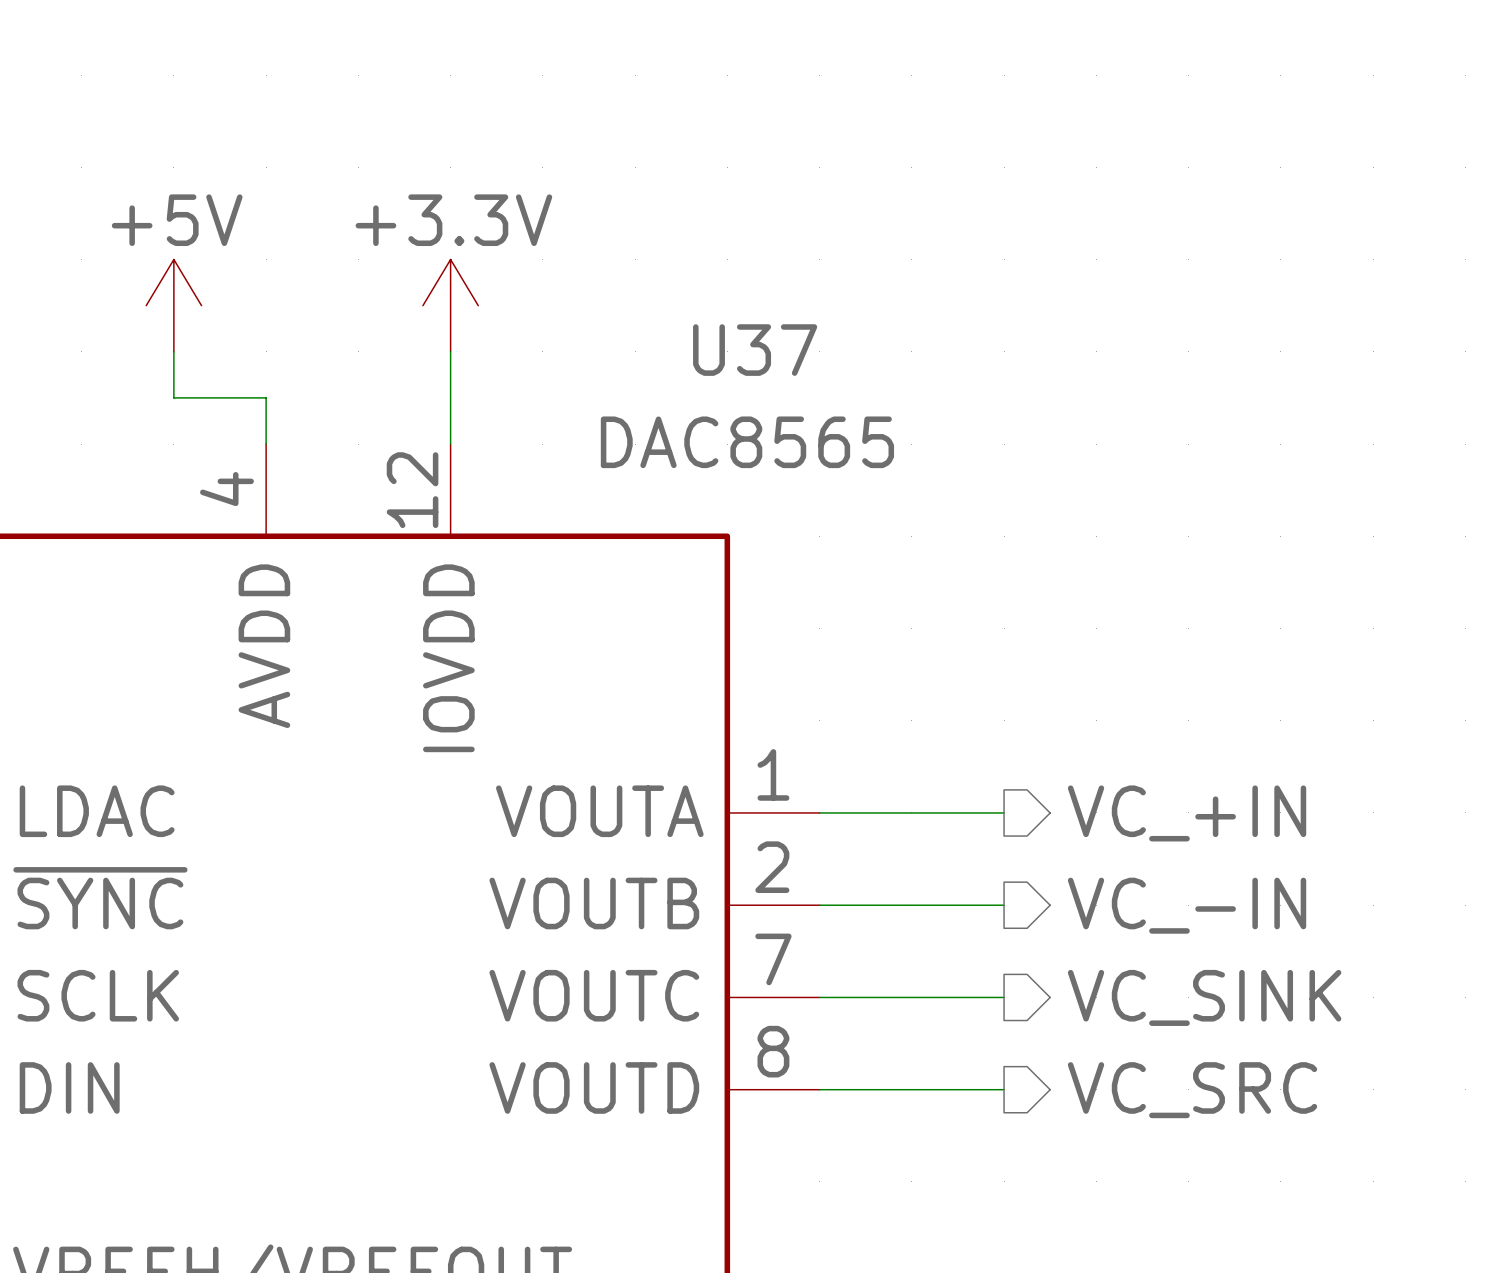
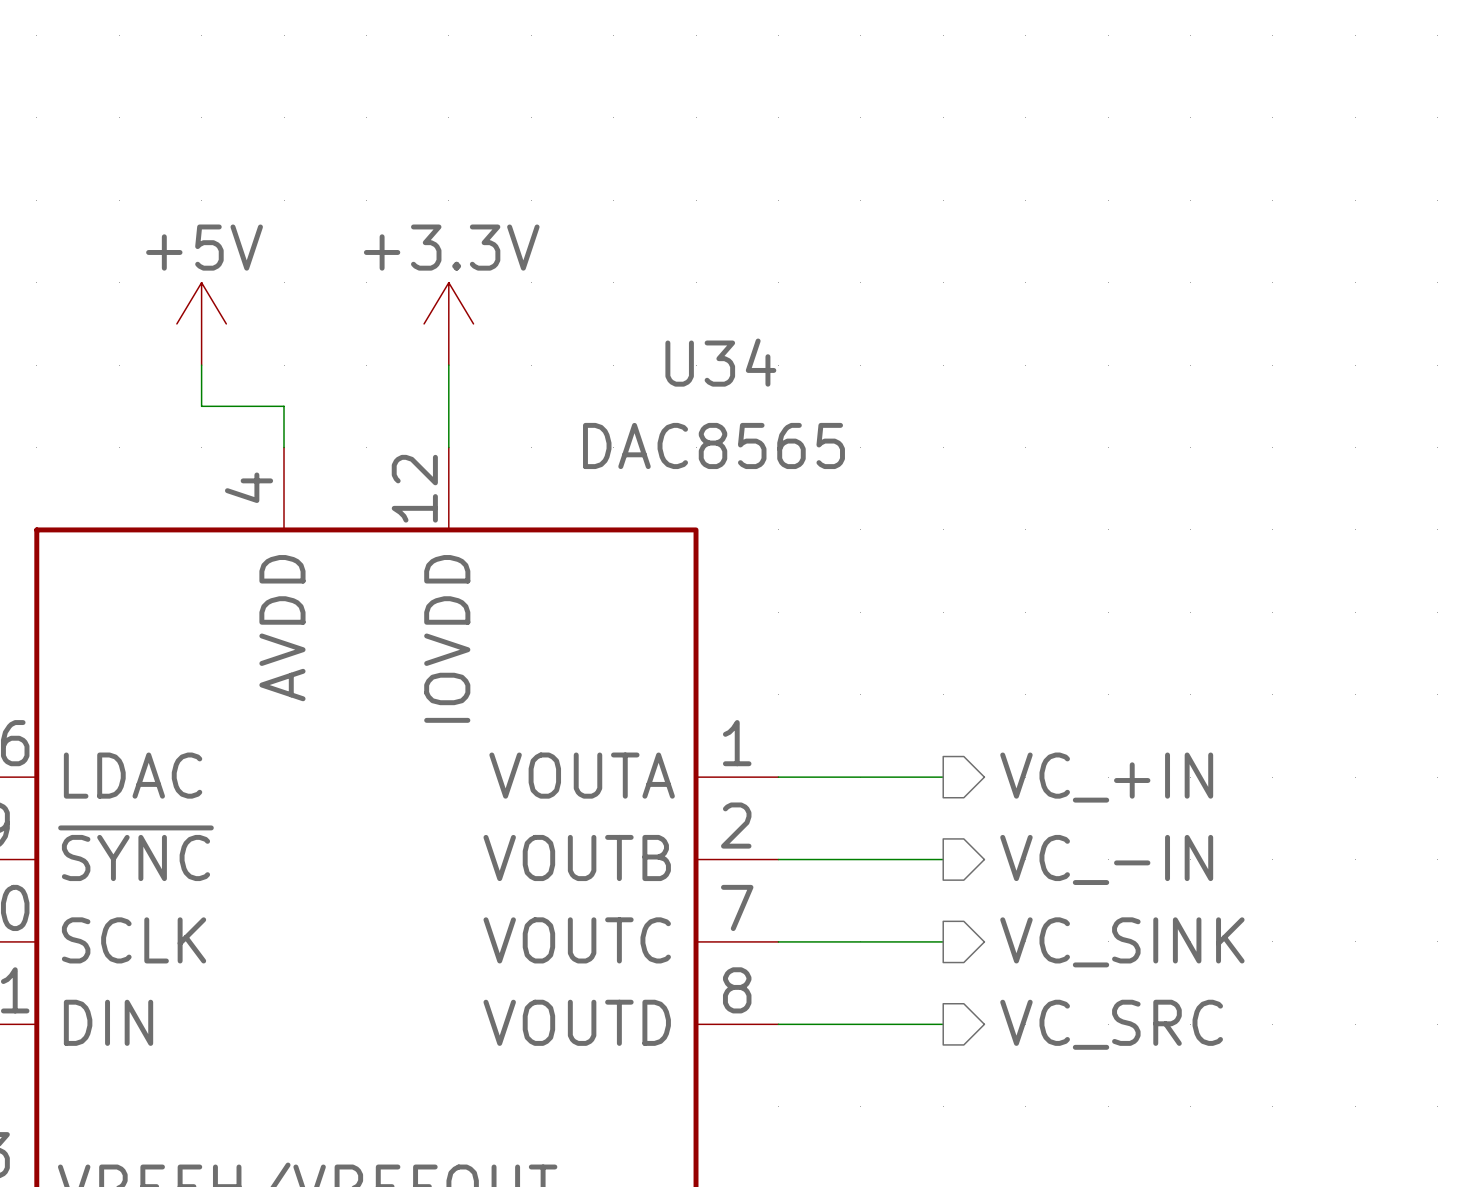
U37 name: U37 (755, 350) -> U34 (720, 362)

